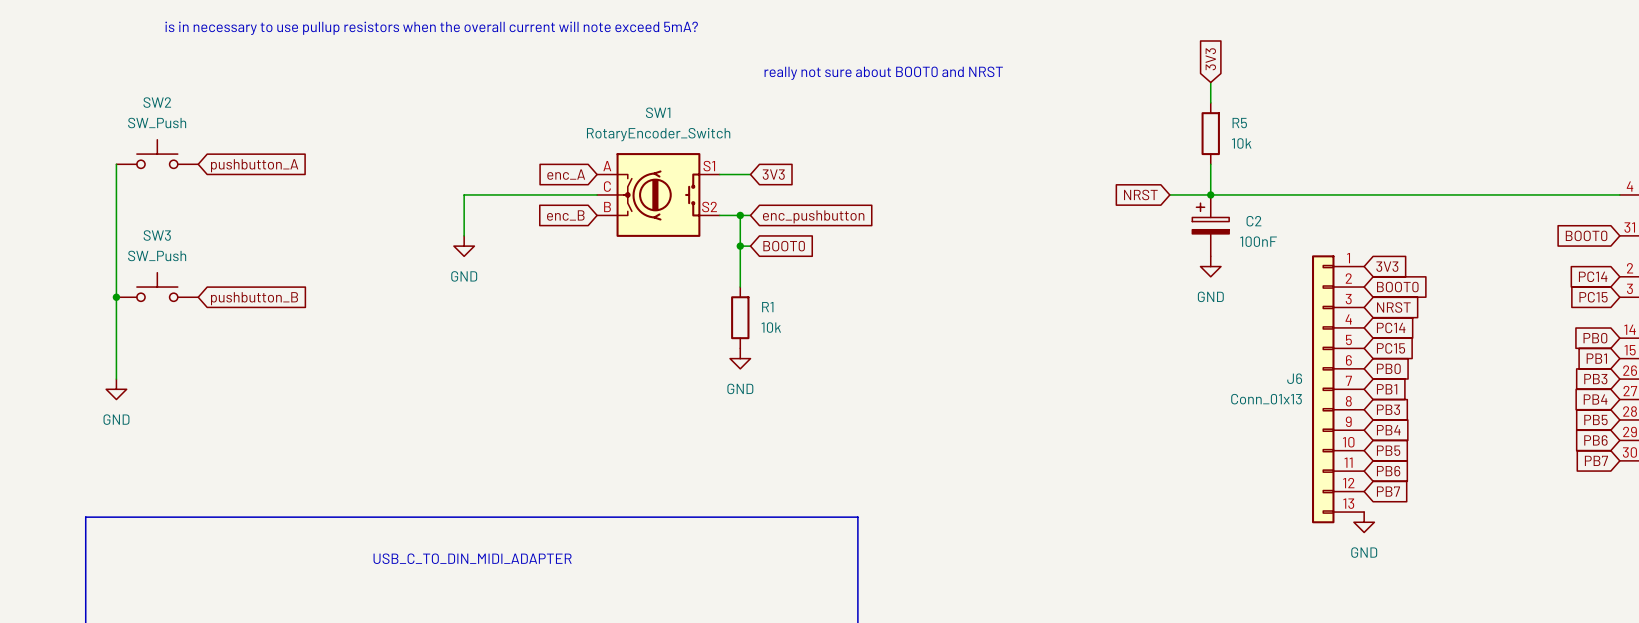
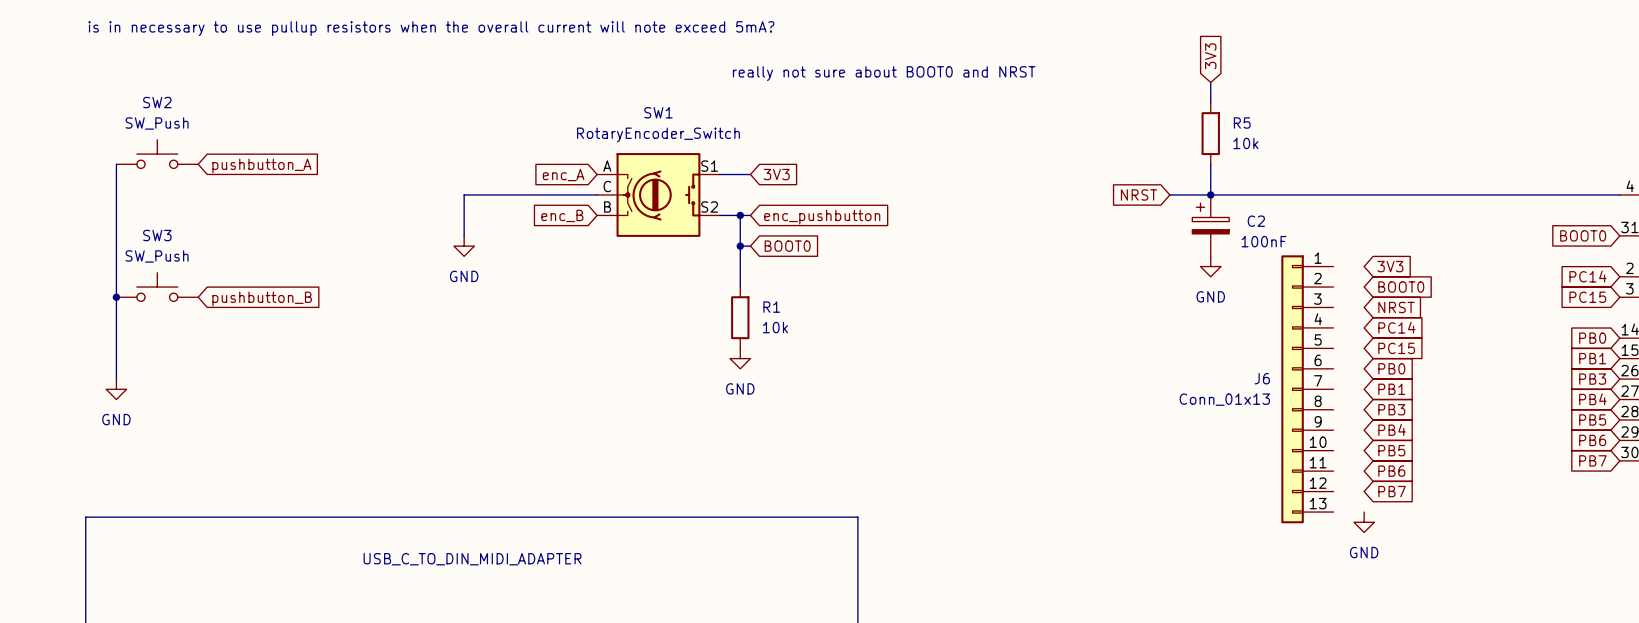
J6 position: (1338, 389) -> (1307, 389)

